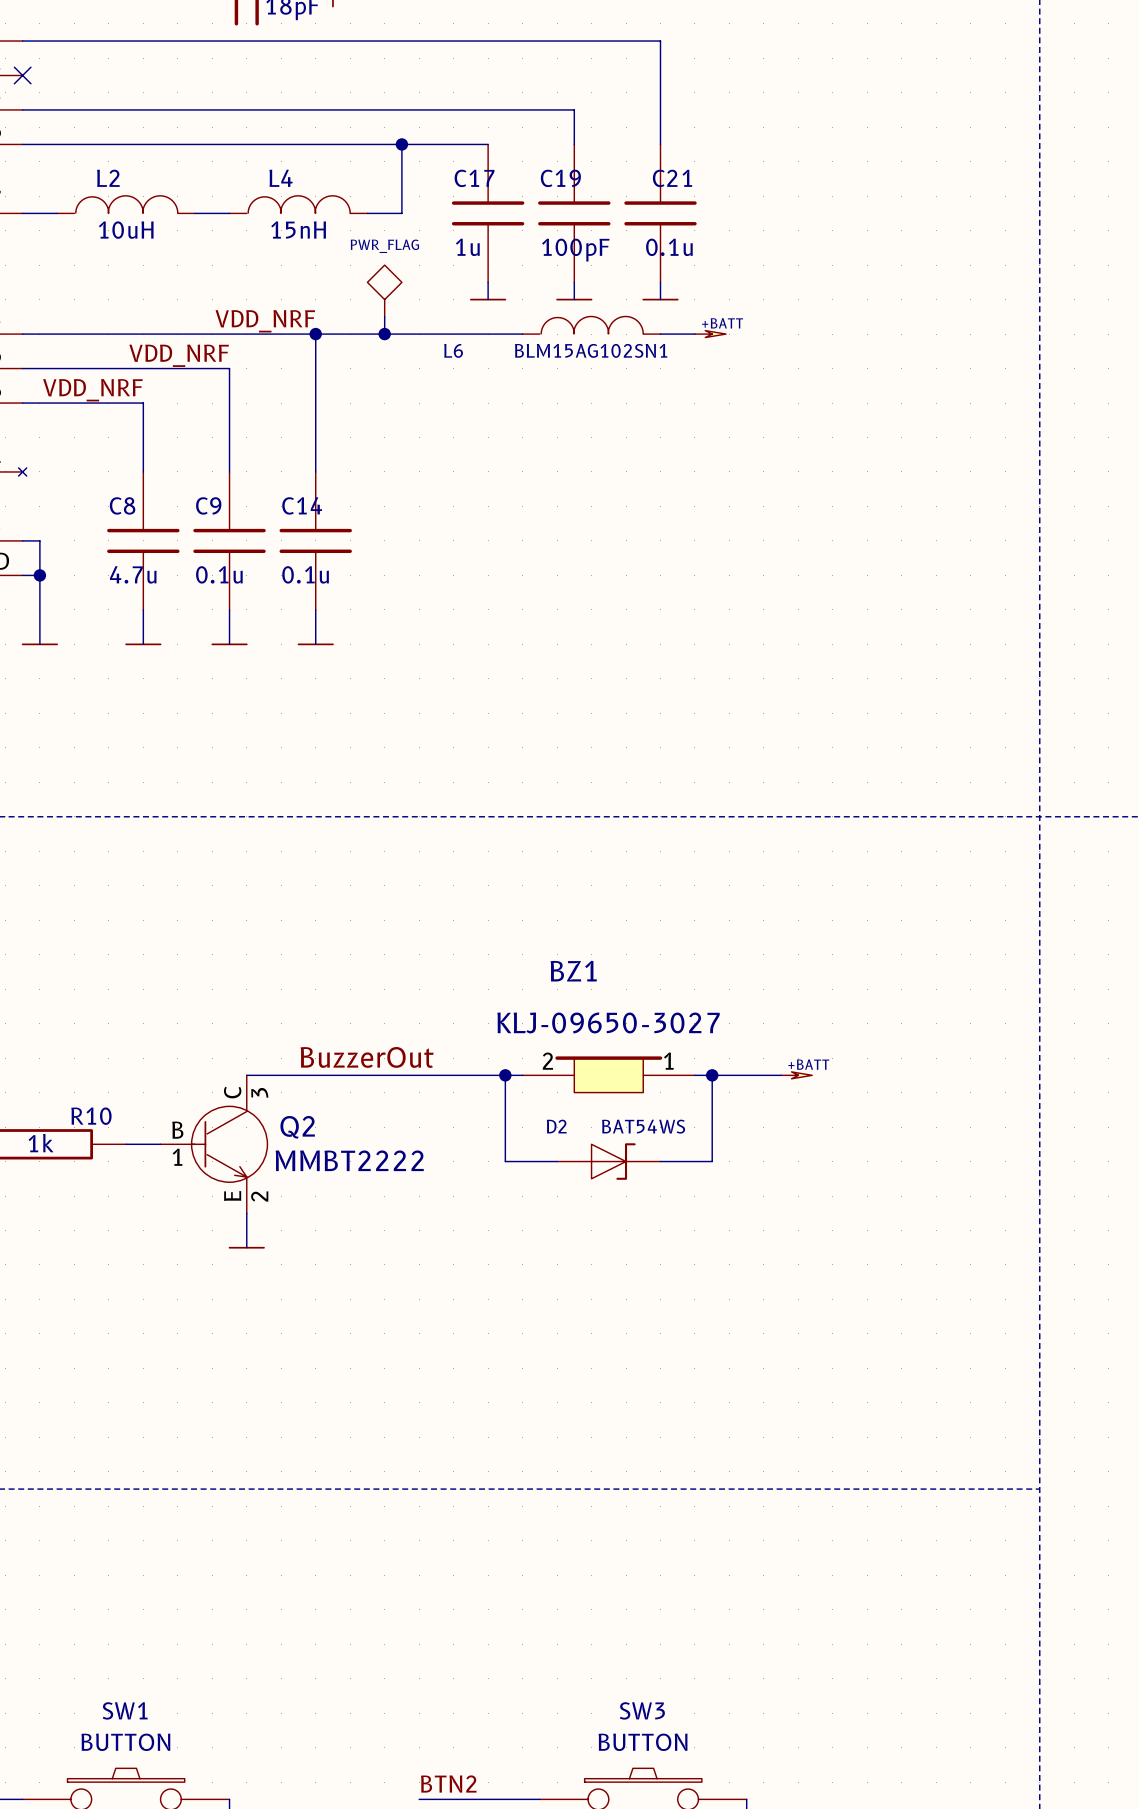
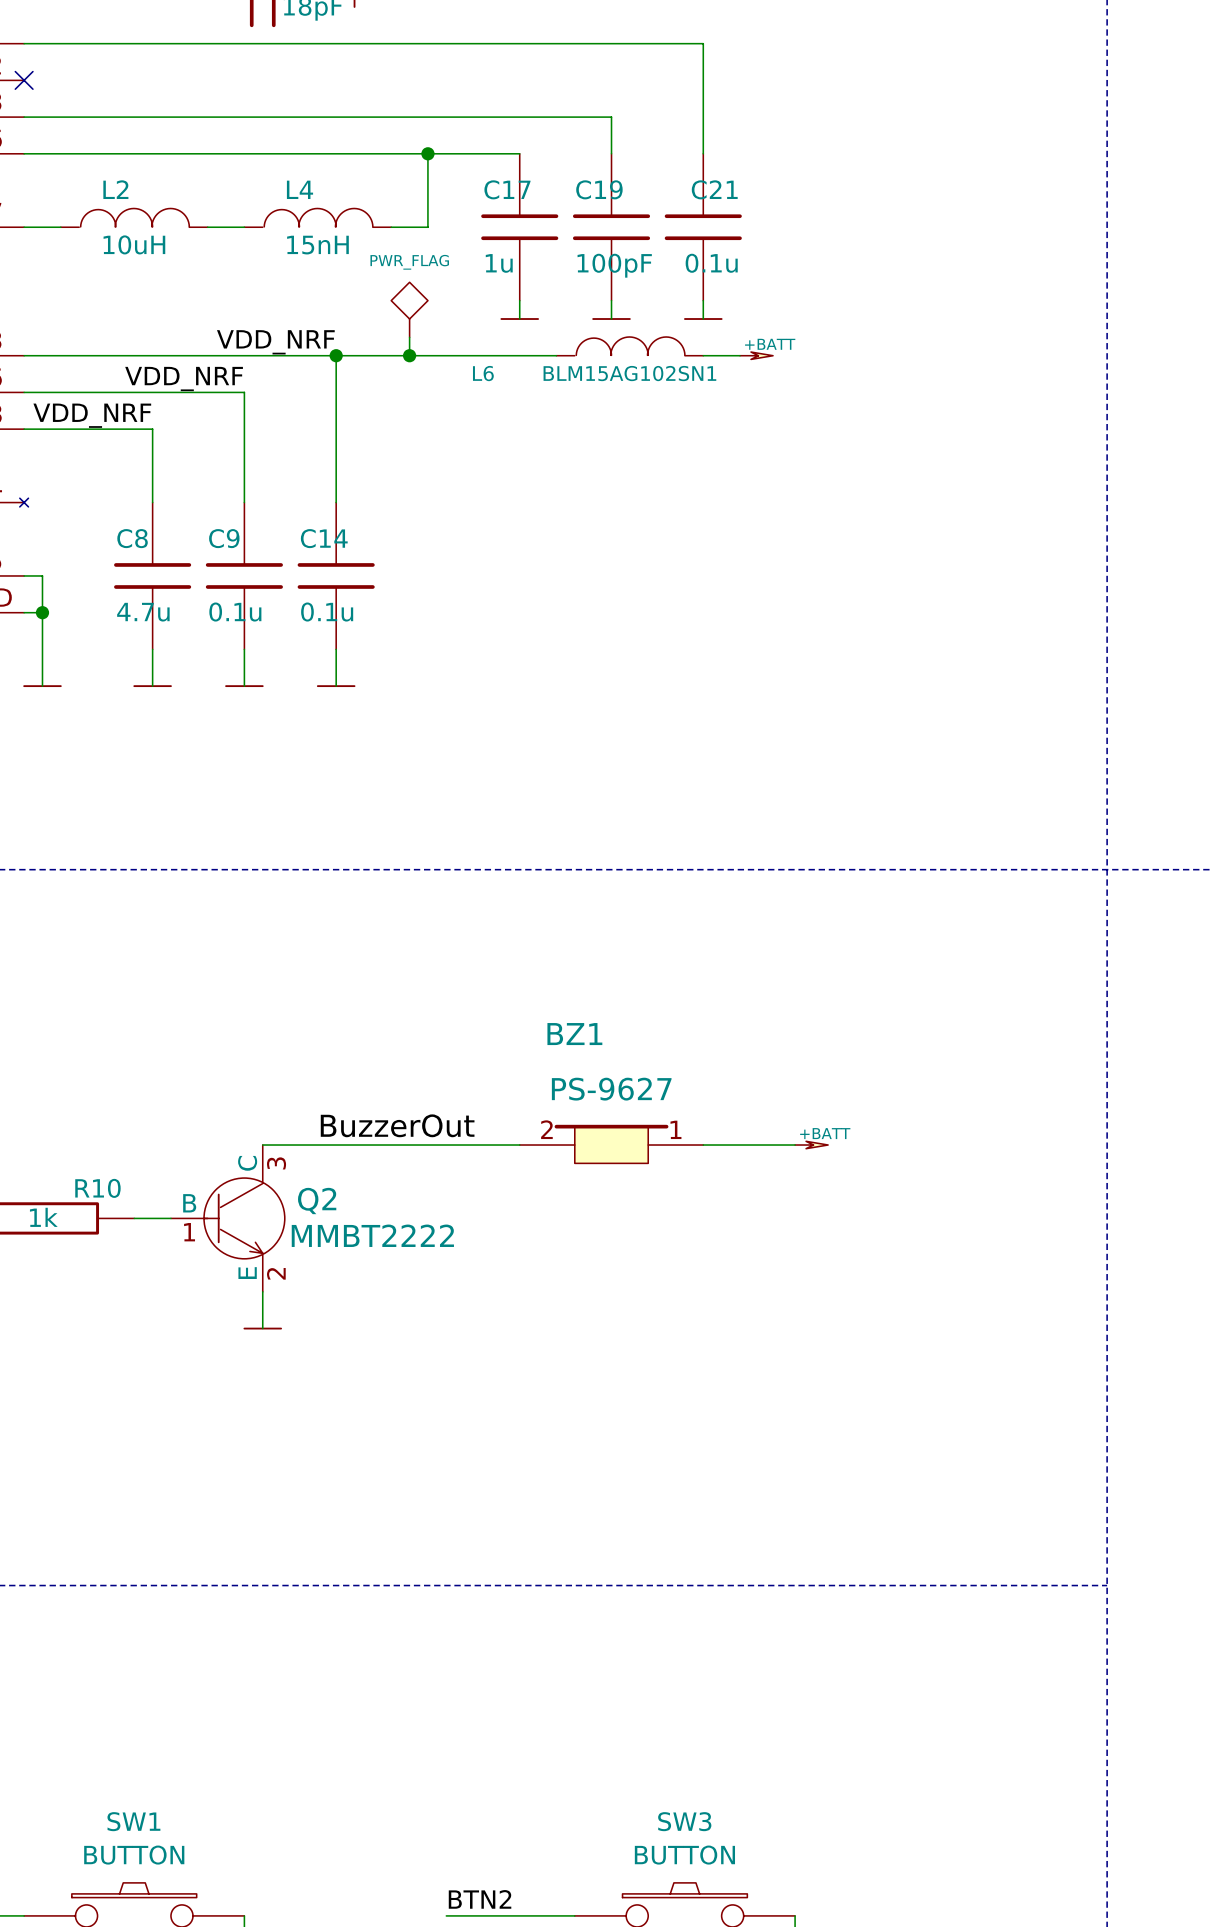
BZ1 value: KLJ-09650-3027 (608, 1022) -> PS-9627 (611, 1089)
BZ1 position: (608, 1074) -> (611, 1144)
wire: (505, 1075) (505, 1161) (557, 1161) -> none
junction: (505, 1075) -> none
wire: (712, 1075) (712, 1161) (660, 1161) -> none
junction: (712, 1075) -> none
power symbol position: +BATT (796, 1075) -> +BATT (811, 1145)
D2: BAT54WS (608, 1161) -> none

